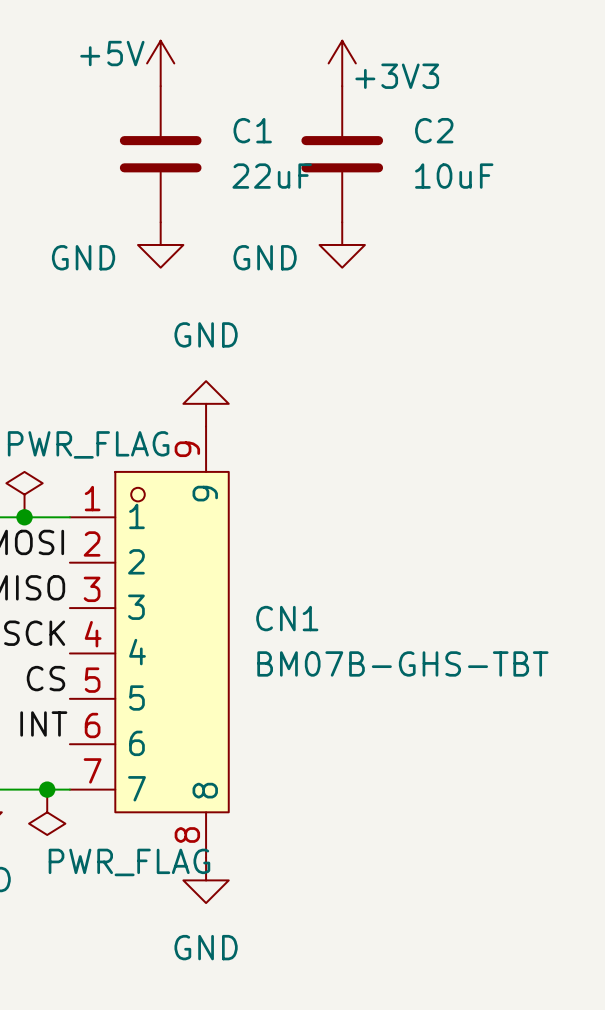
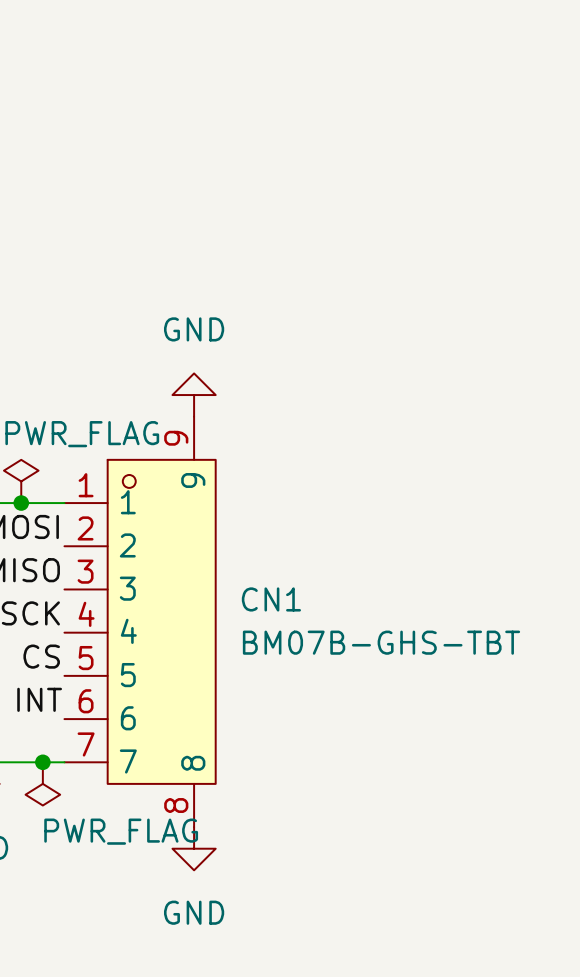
power symbol: +5V (160, 63) -> none
power symbol: +3V3 (342, 63) -> none
C1: 22uF (160, 154) -> none
C2: 10uF (342, 154) -> none
power symbol: GND (160, 244) -> none
power symbol: GND (342, 244) -> none

